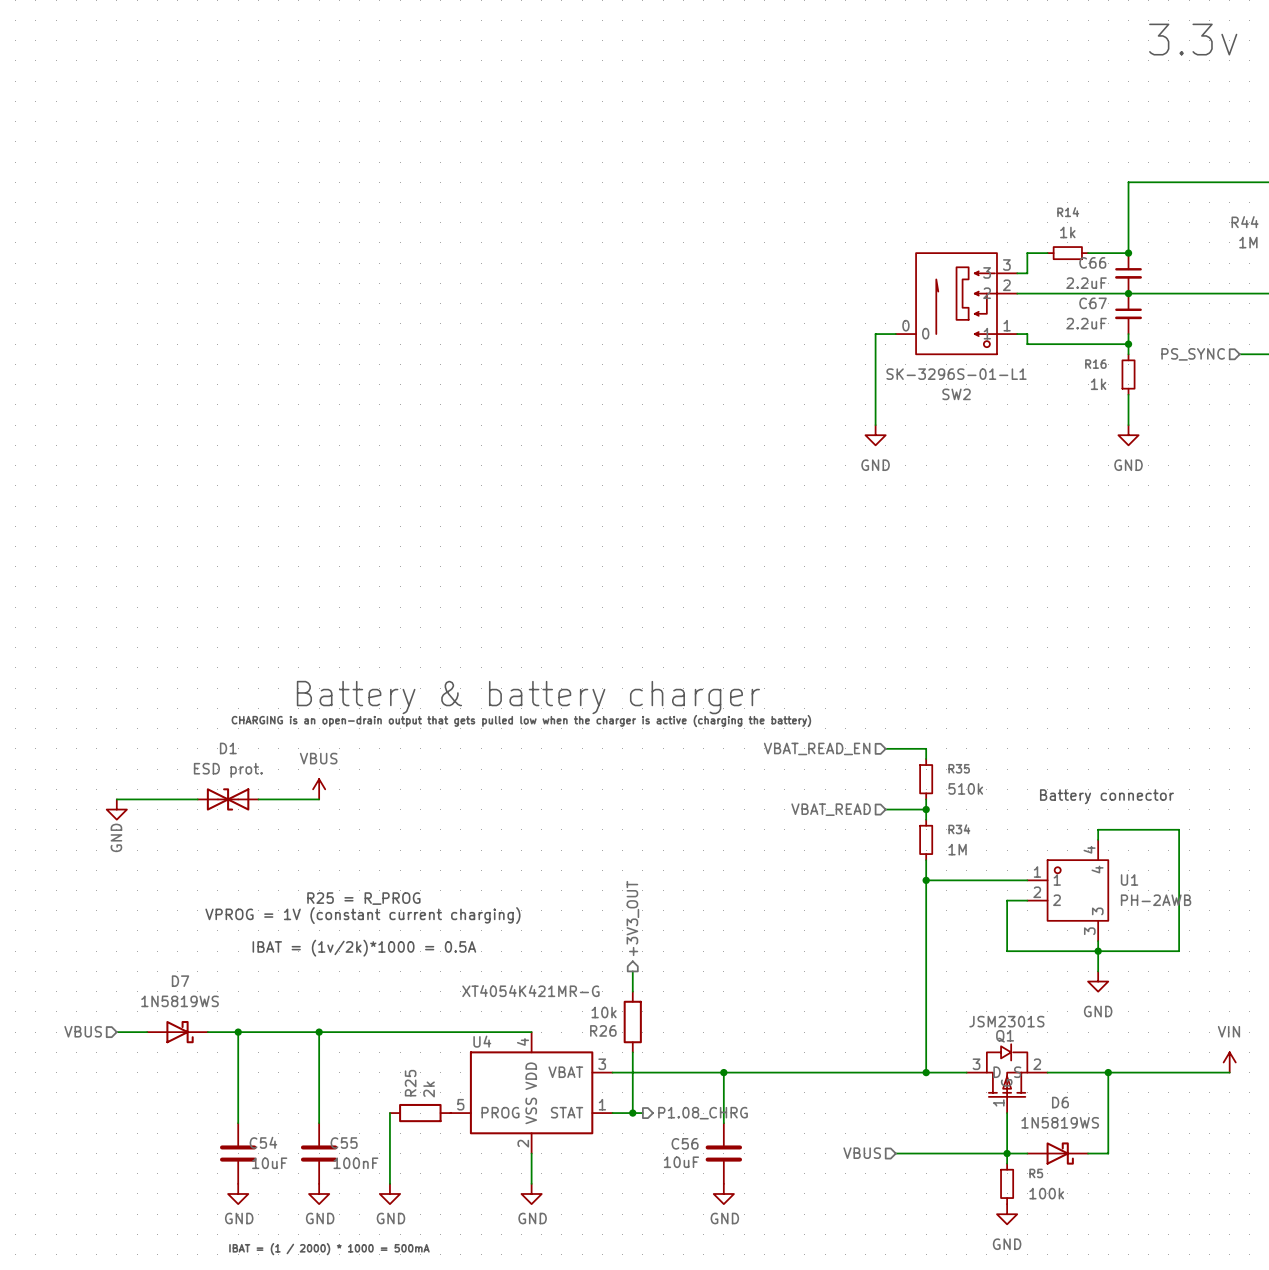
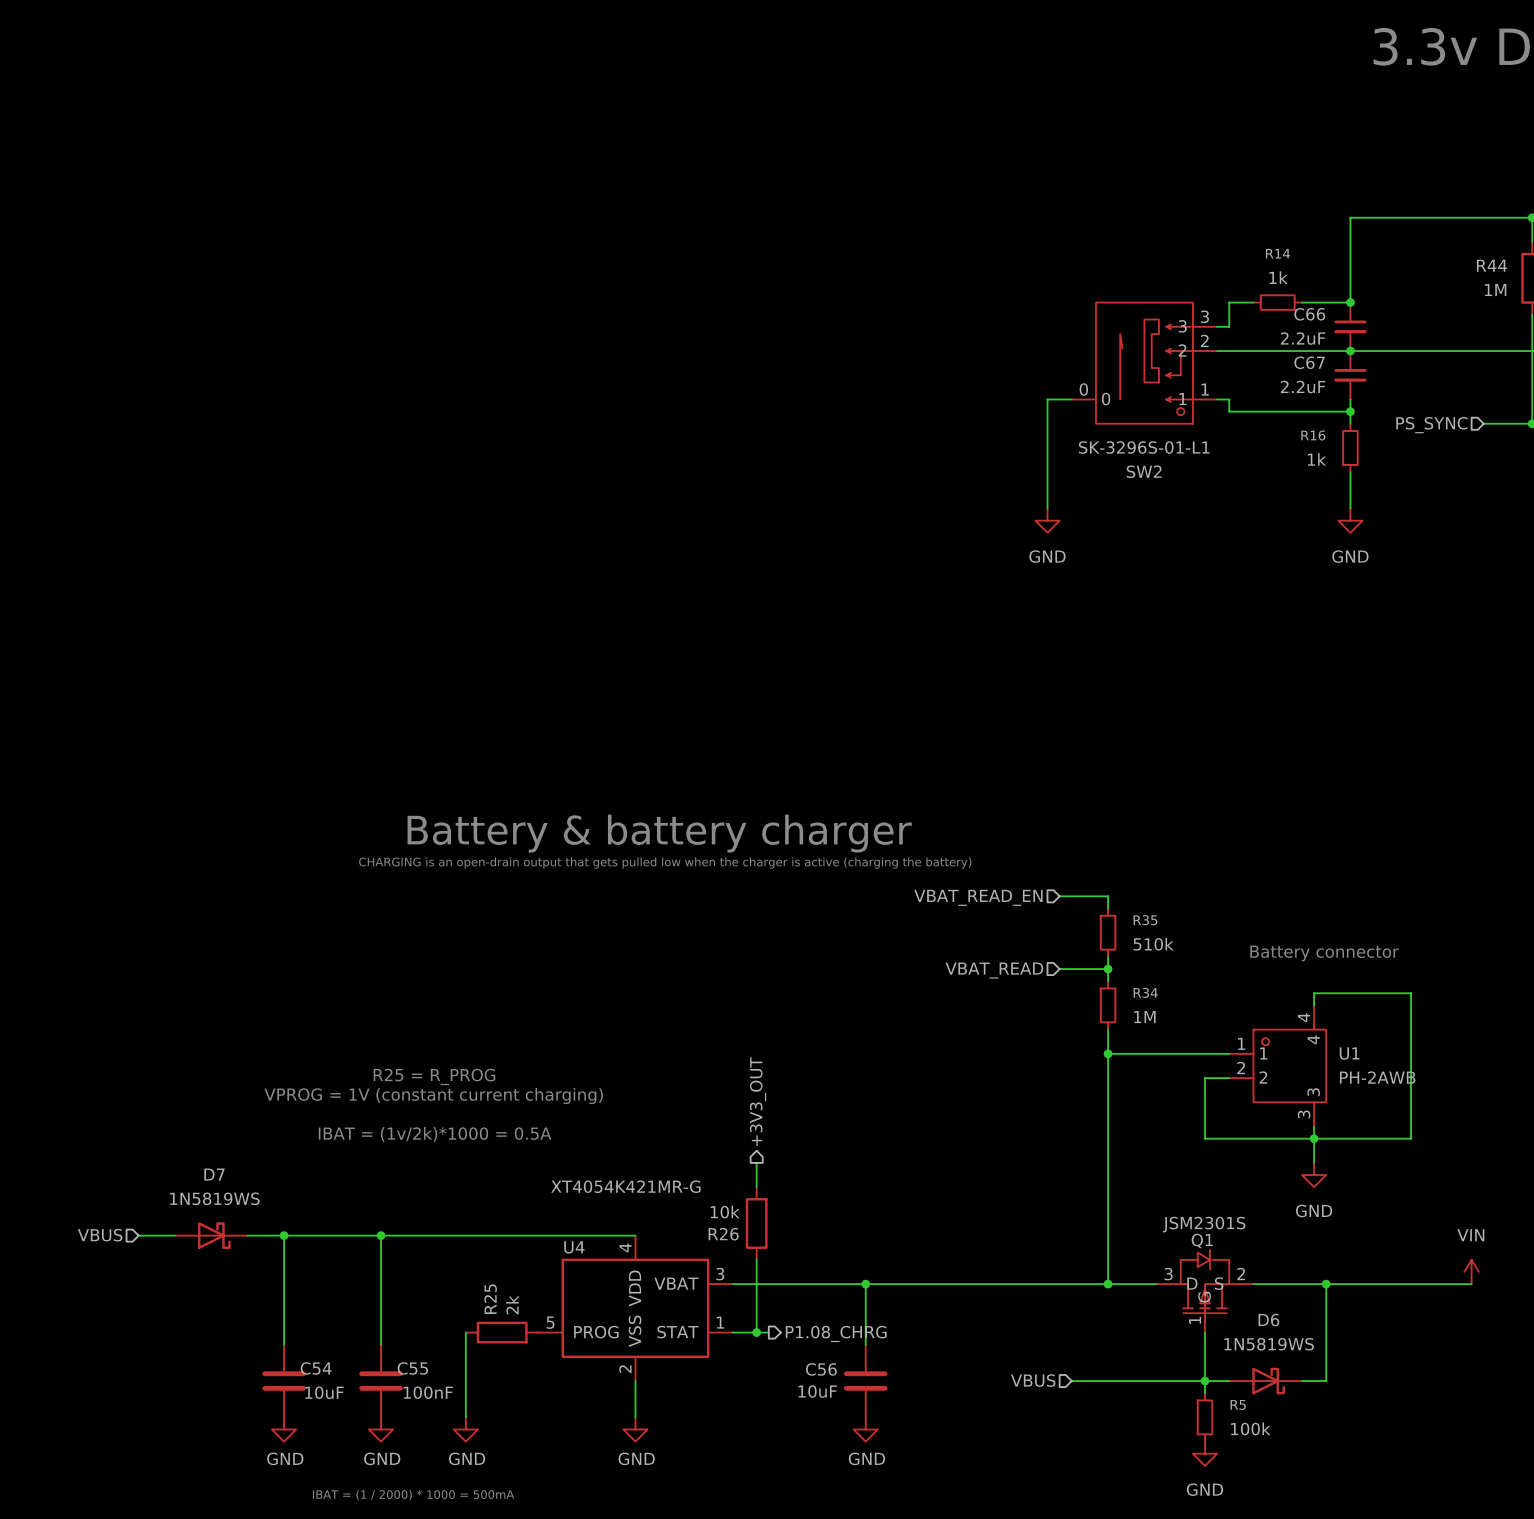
power symbol: VBUS (319, 789) -> none
wire: (116, 799) (197, 799) -> none
D1: ESD prot. (228, 799) -> none
wire: (258, 799) (319, 799) -> none
power symbol: GND (116, 809) -> none

